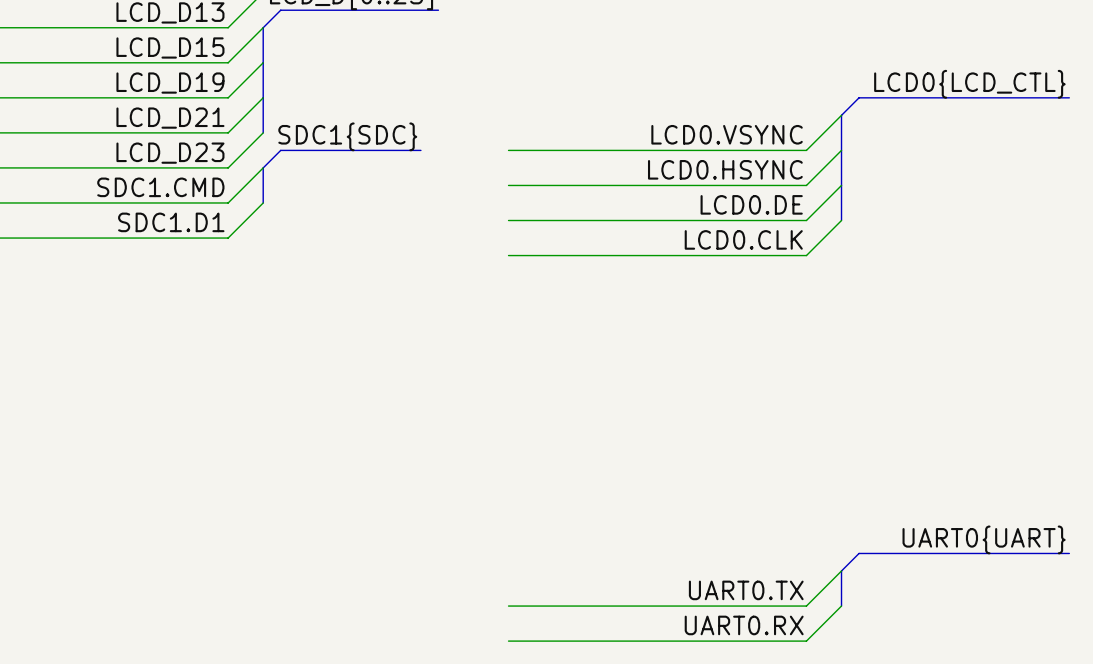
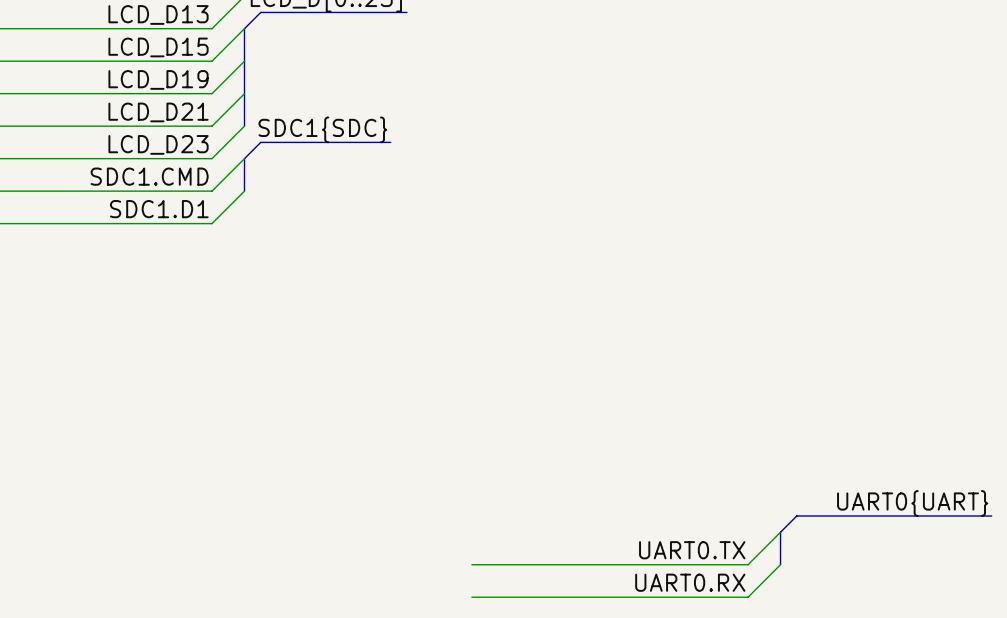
label: LCD0{LCD_CTL} (969, 84) -> none
bus: (1069, 97) (859, 97) (841, 115) (841, 220) -> none
wire: (841, 115) (806, 150) (508, 150) -> none
label: LCD0.VSYNC (727, 134) -> none
wire: (841, 150) (806, 185) (508, 185) -> none
label: LCD0.HSYNC (725, 169) -> none
wire: (841, 185) (806, 220) (508, 220) -> none
label: LCD0.DE (751, 204) -> none
wire: (841, 220) (806, 255) (508, 255) -> none
label: LCD0.CLK (743, 239) -> none

